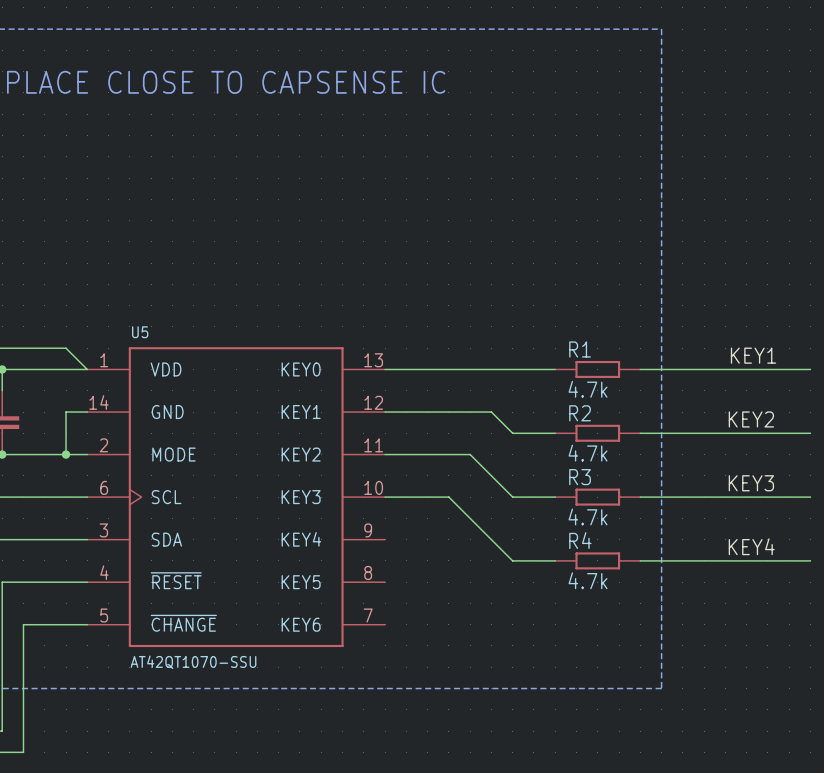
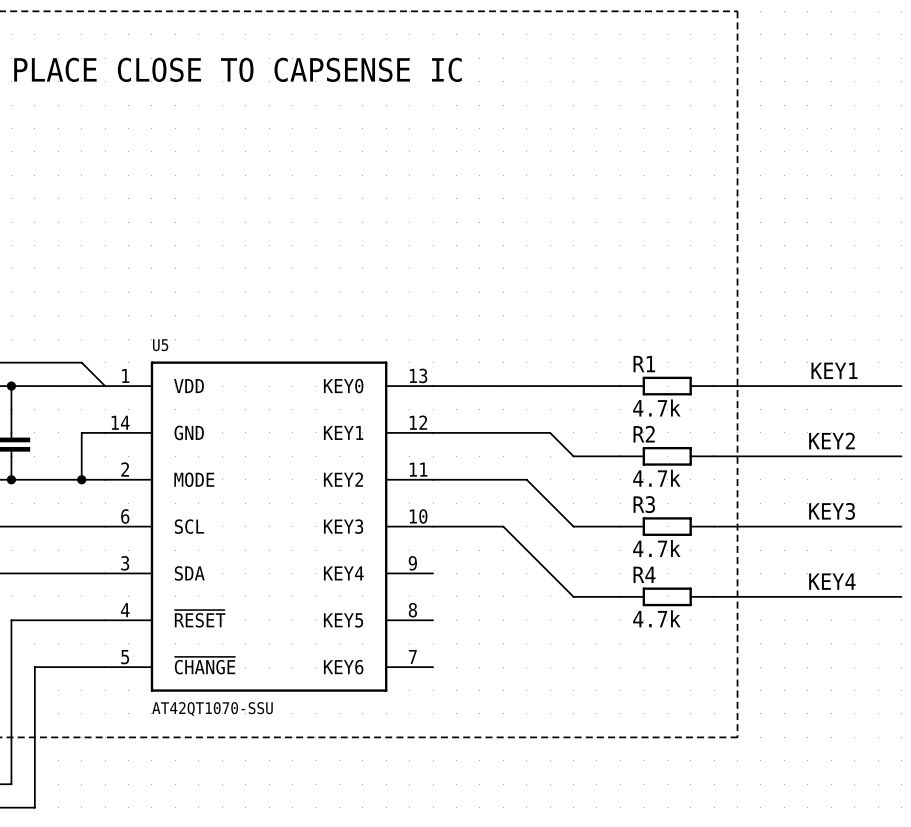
U5 symbol: [87, 347, 386, 648] -> [105, 361, 434, 692]

